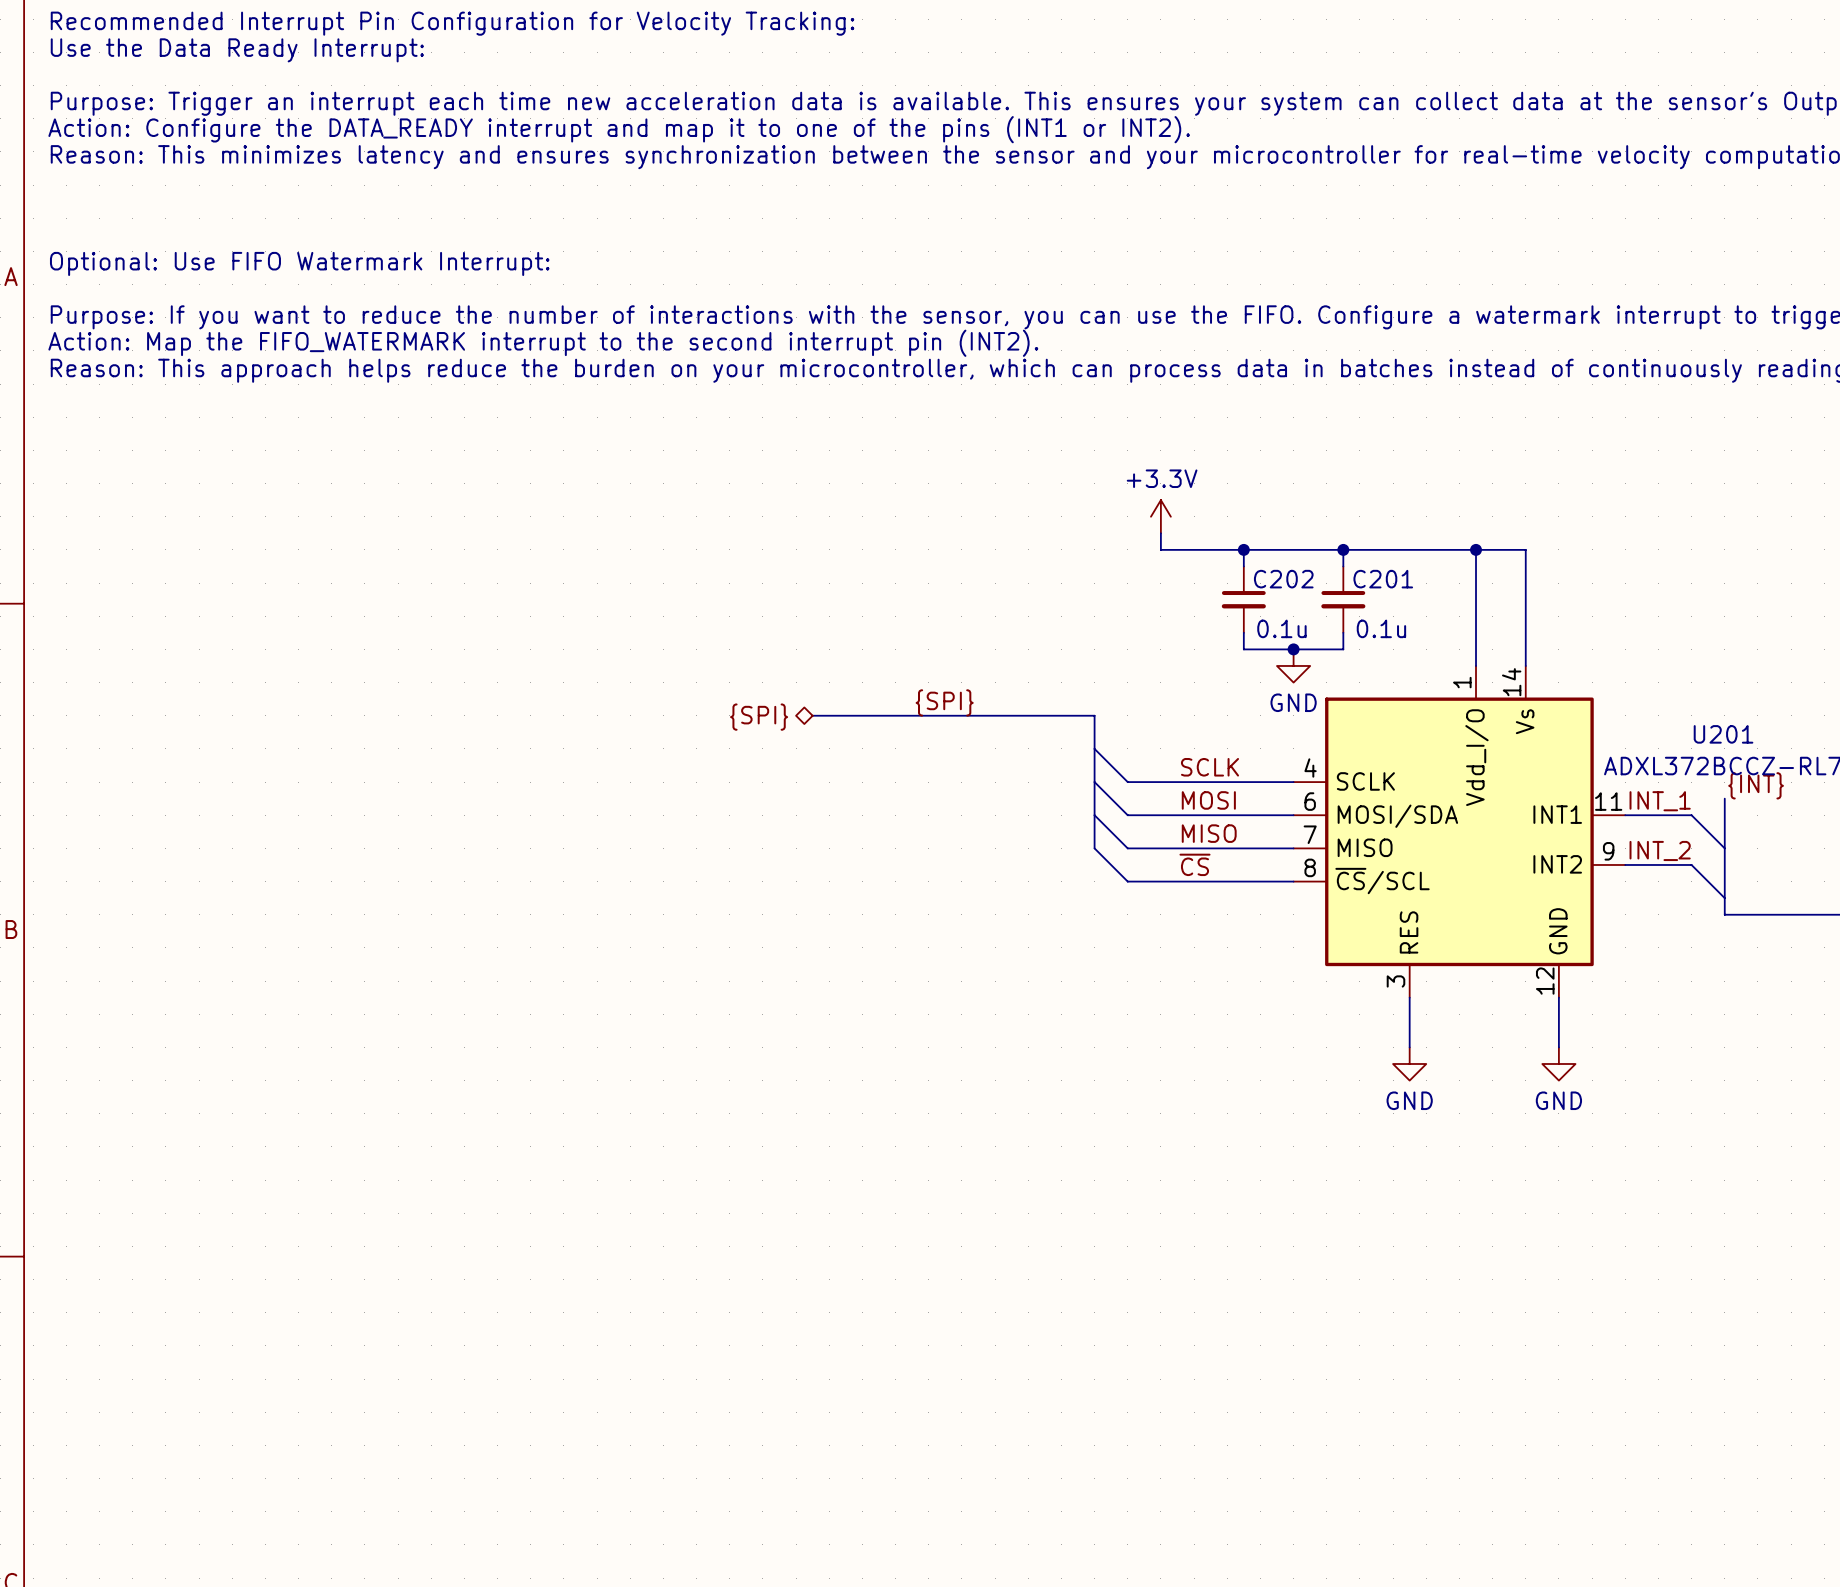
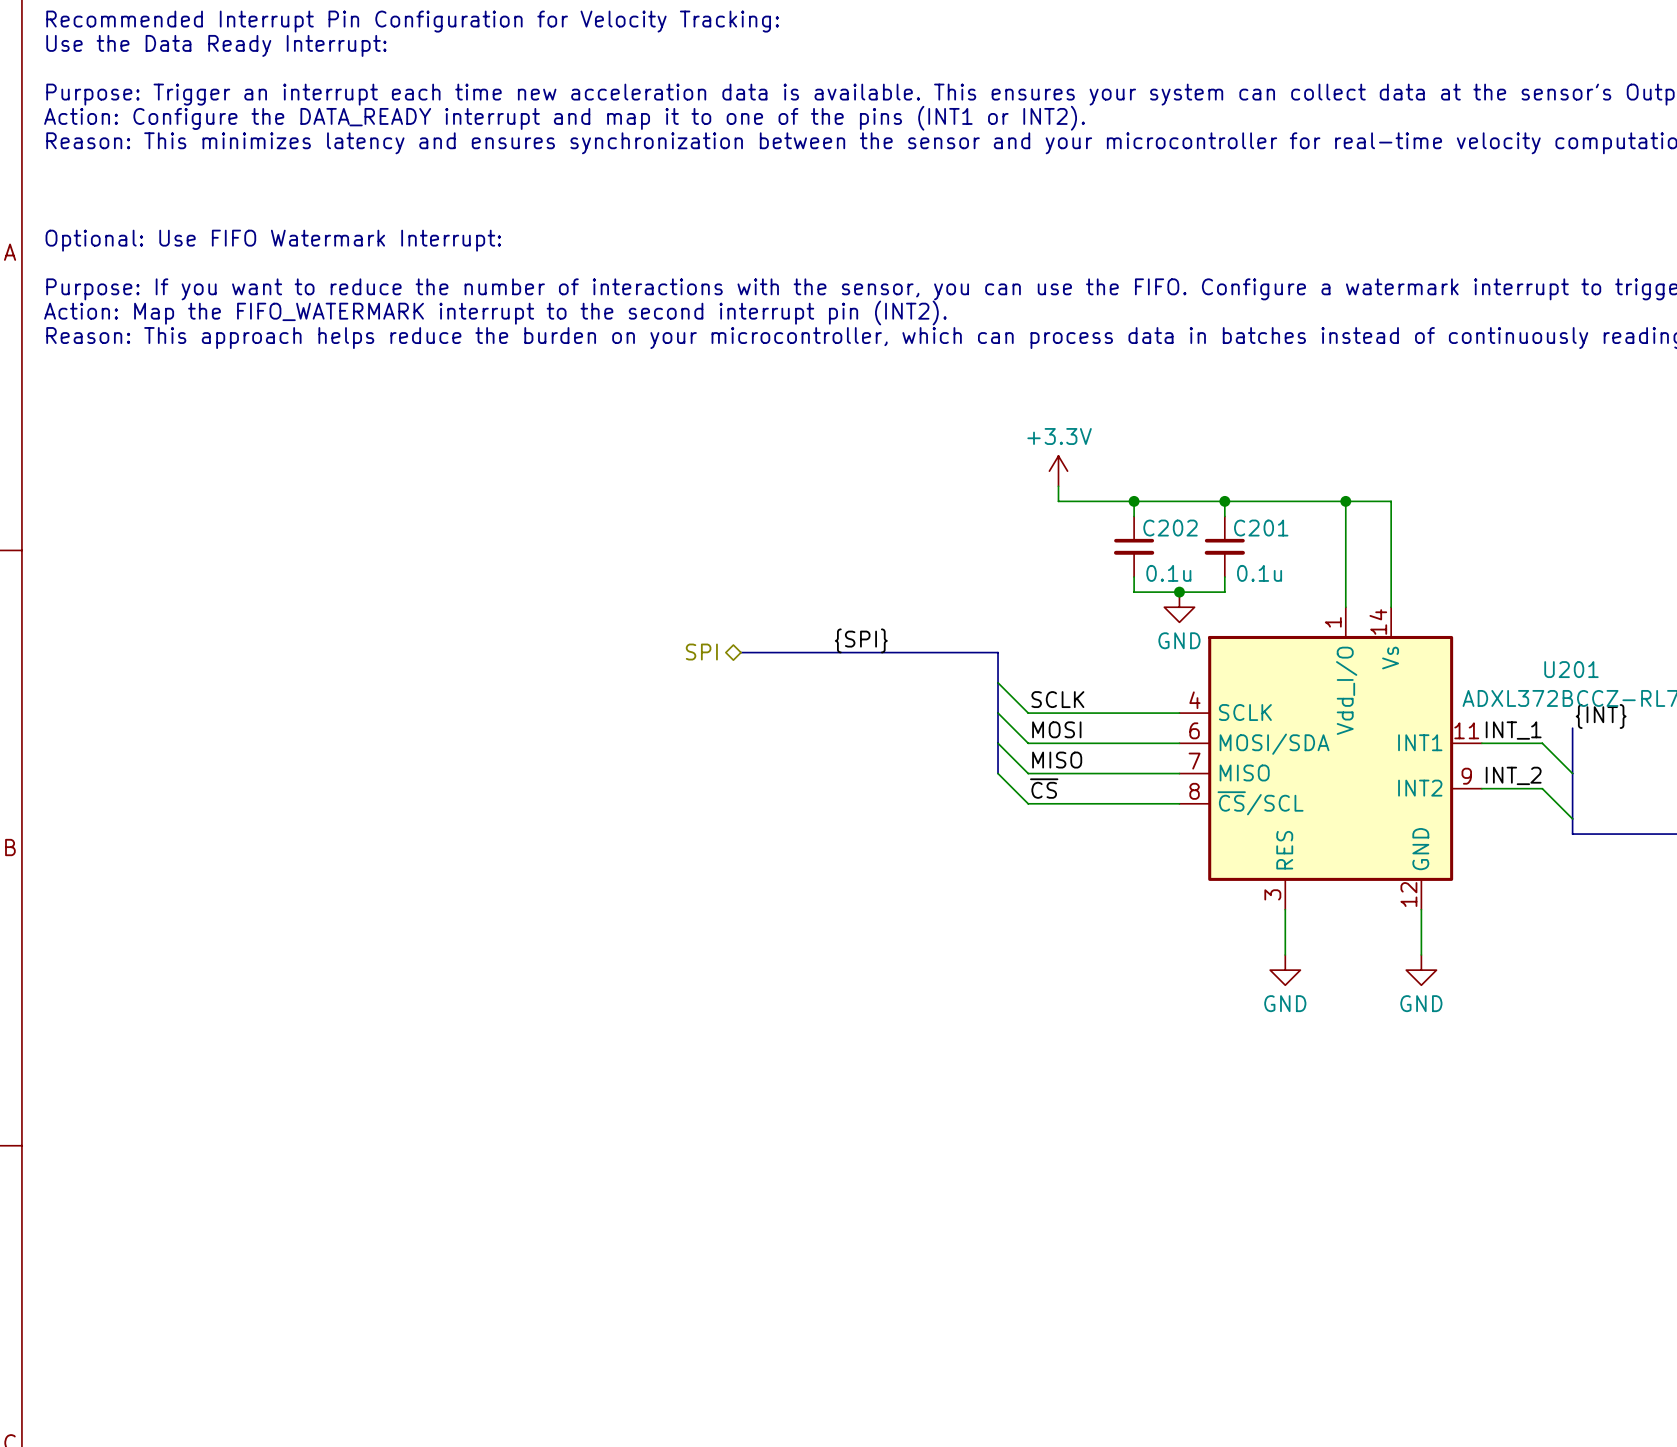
hierarchical label: {SPI} (759, 717) -> SPI (701, 652)
label position: SCLK (1210, 767) -> SCLK (1057, 699)
label position: MOSI (1208, 800) -> MOSI (1056, 729)
label position: MISO (1209, 833) -> MISO (1057, 760)
label position: ~{CS} (1194, 864) -> ~{CS} (1044, 788)

